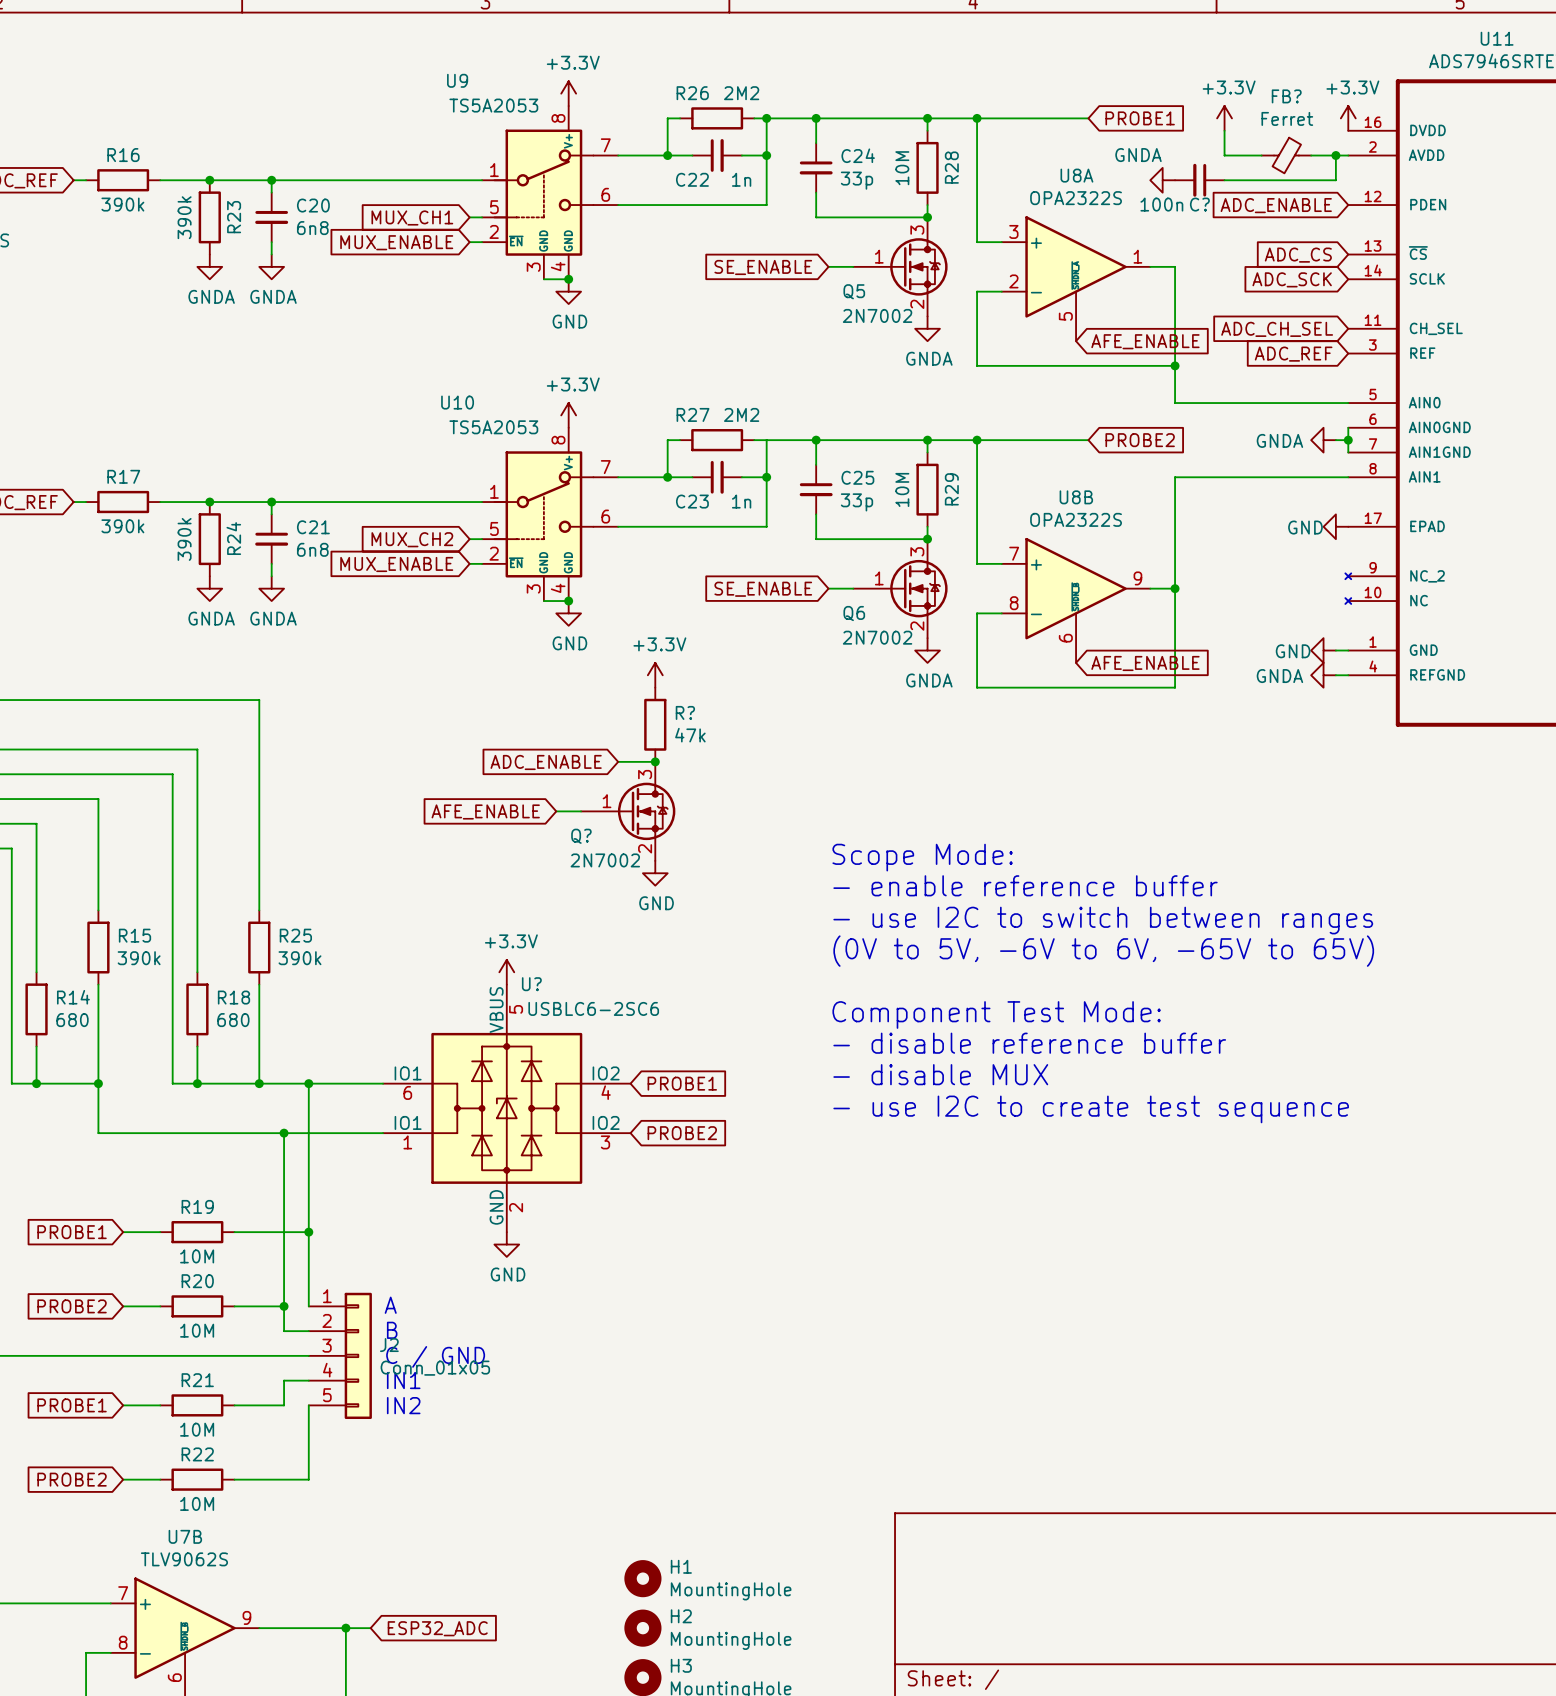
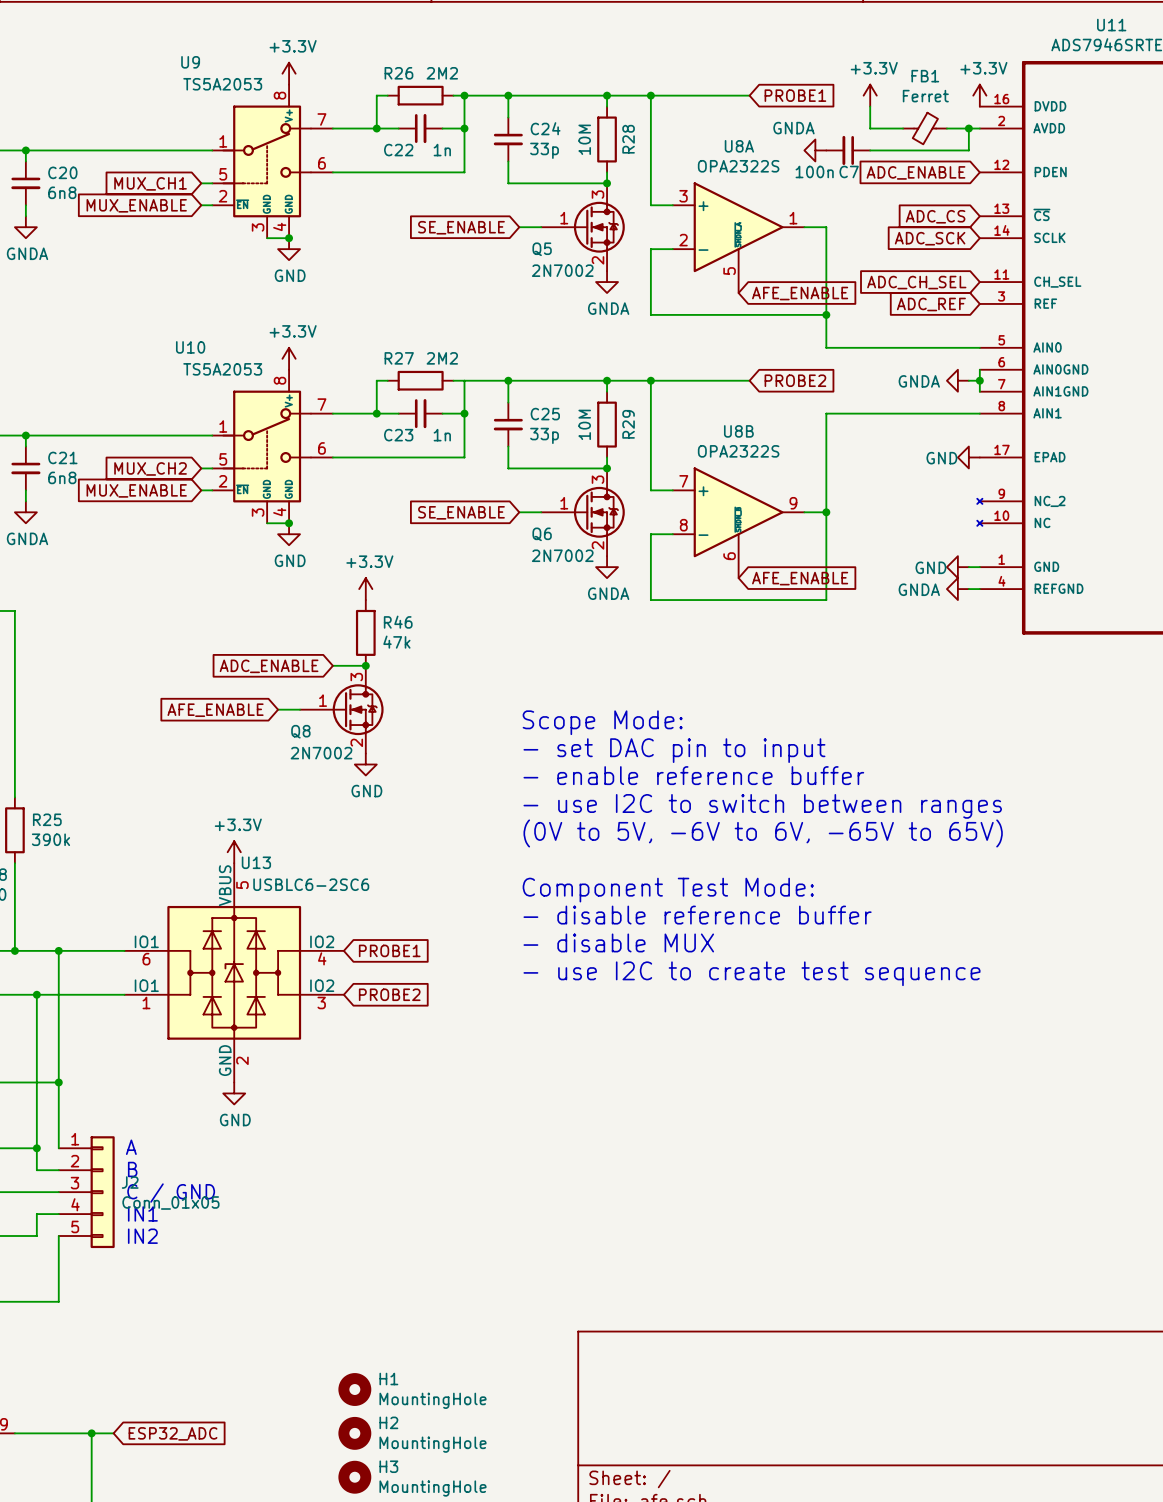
FB? name: FB? (1286, 96) -> FB1 (925, 76)
C? name: C? (1199, 204) -> C7 (849, 171)
R? name: R? (685, 712) -> R46 (398, 622)
text: none -> Scope Mode: (602, 722)
Q? name: Q? (581, 836) -> Q8 (300, 731)
text: Scope Mode: (922, 857) -> - set DAC pin to input (674, 750)
U? name: U? (531, 984) -> U13 (256, 862)

